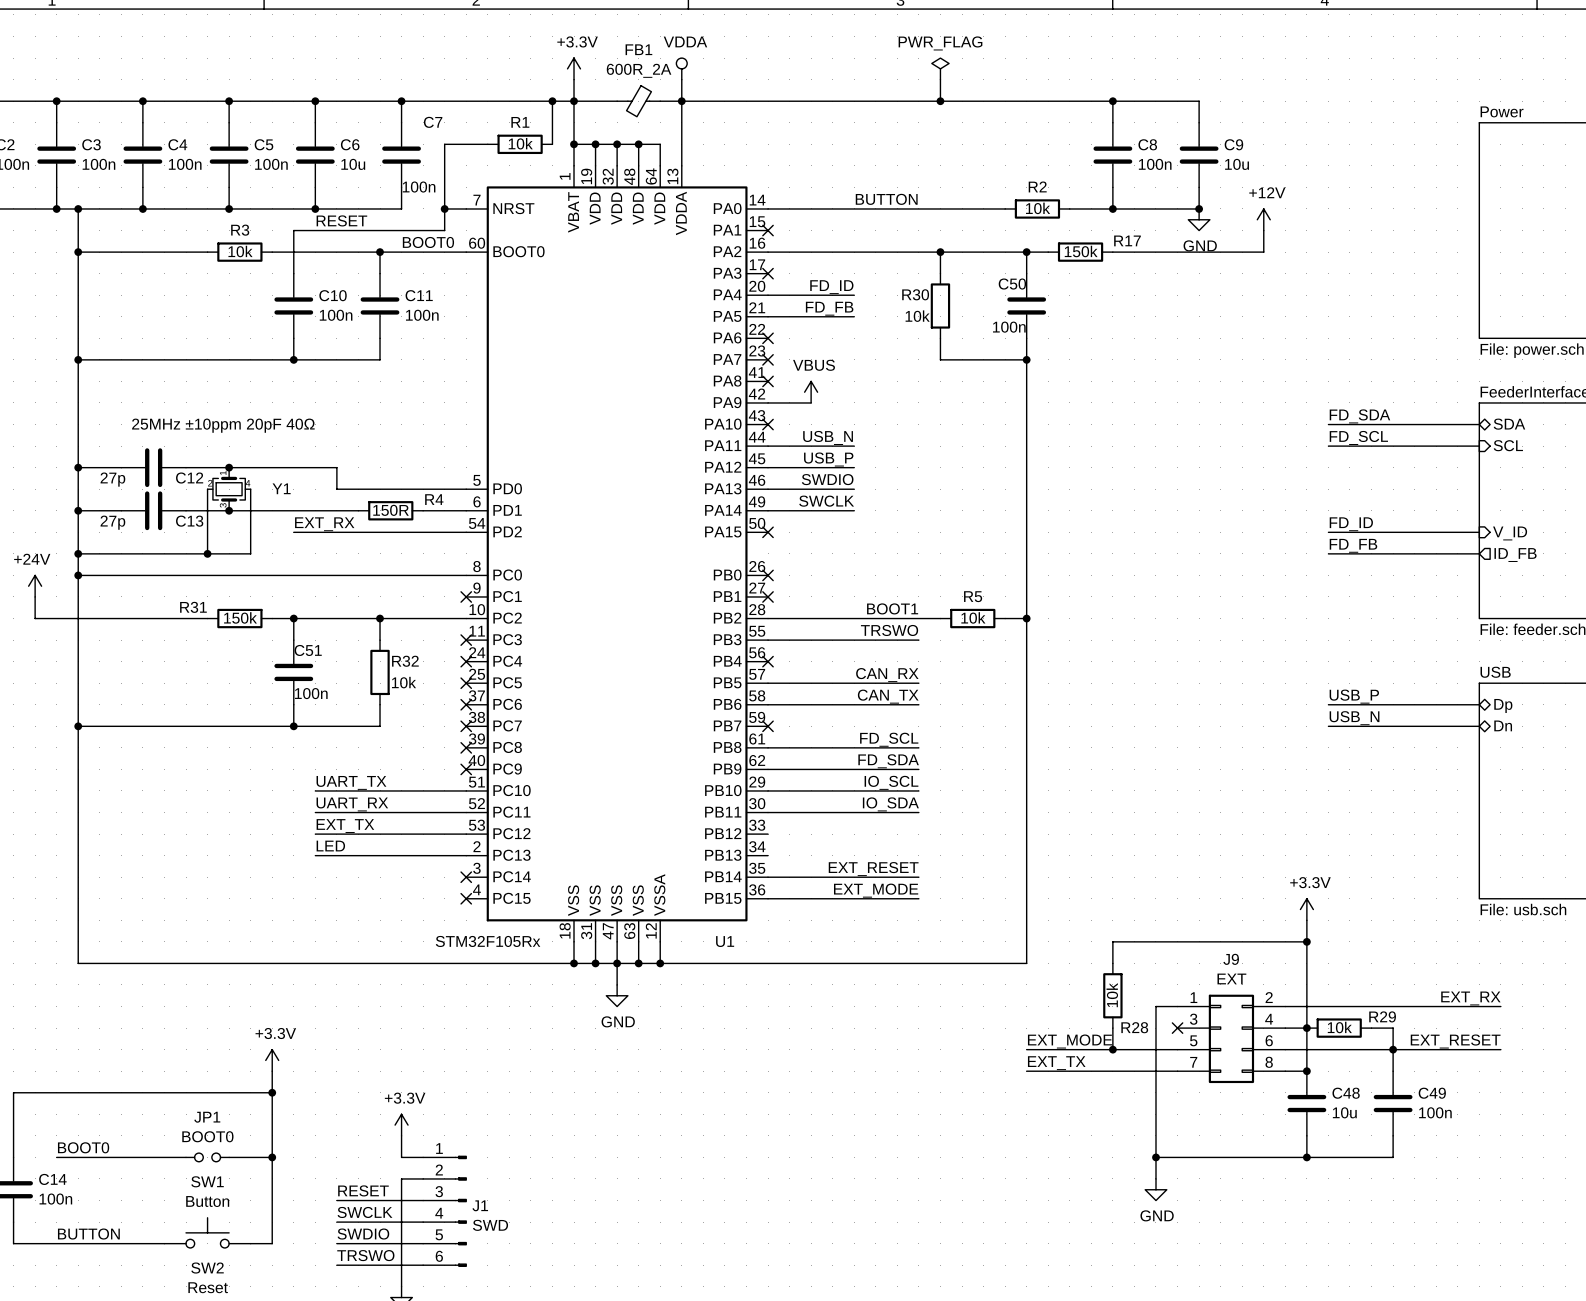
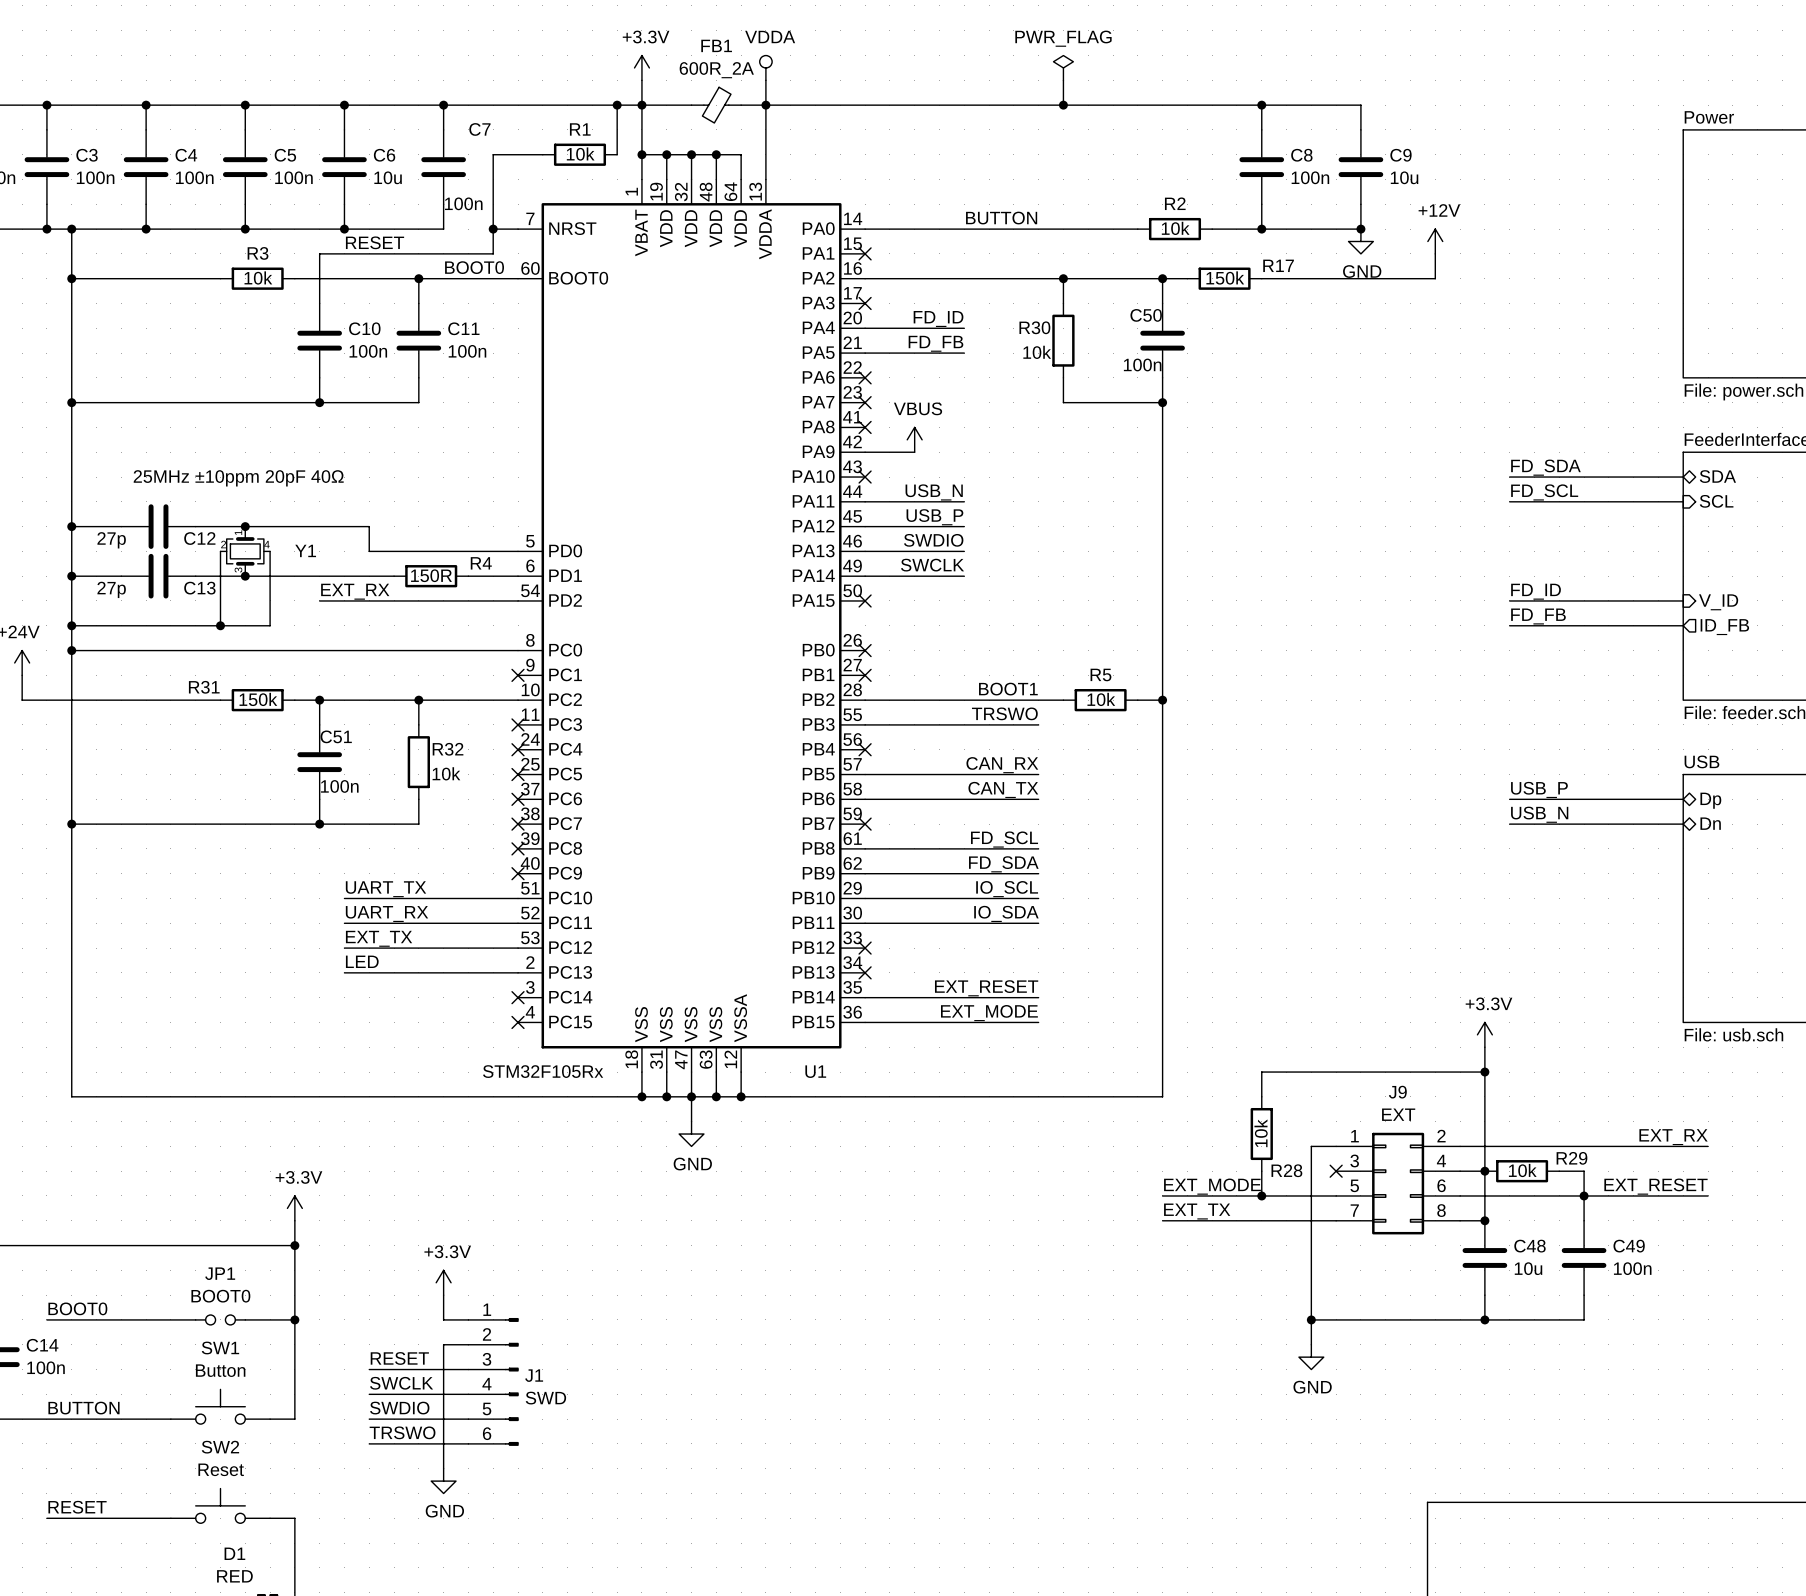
no-connect mark: none -> (865, 948)
no-connect mark: none -> (865, 972)

